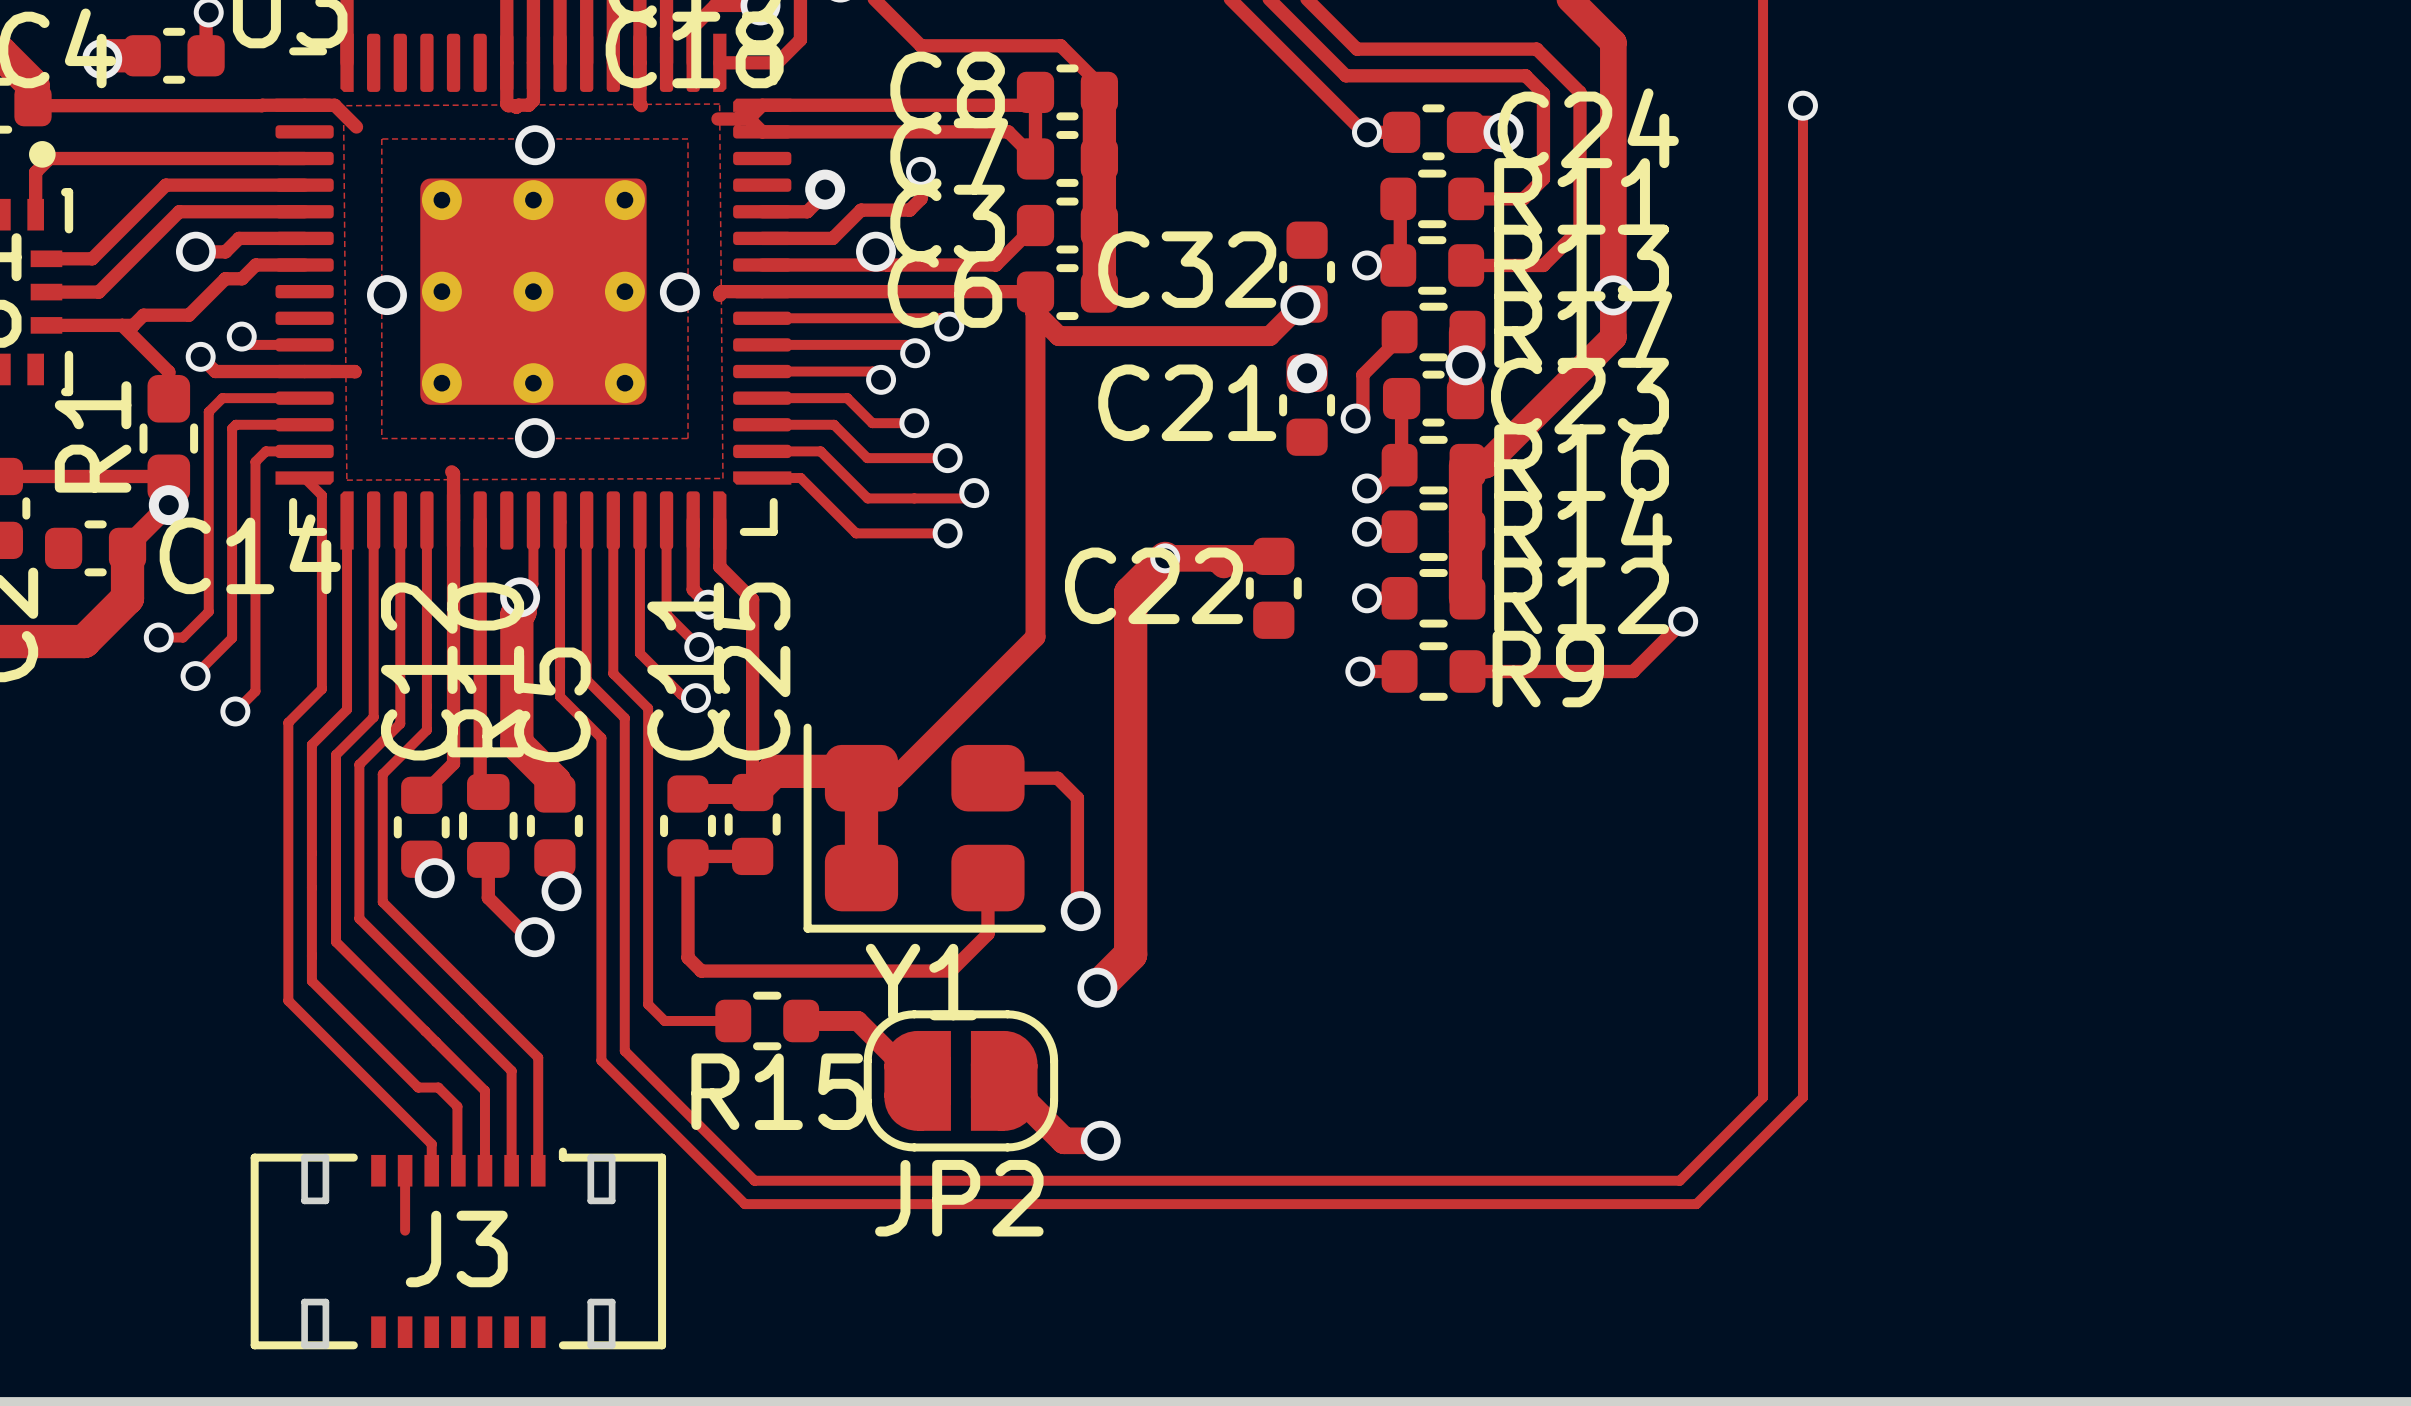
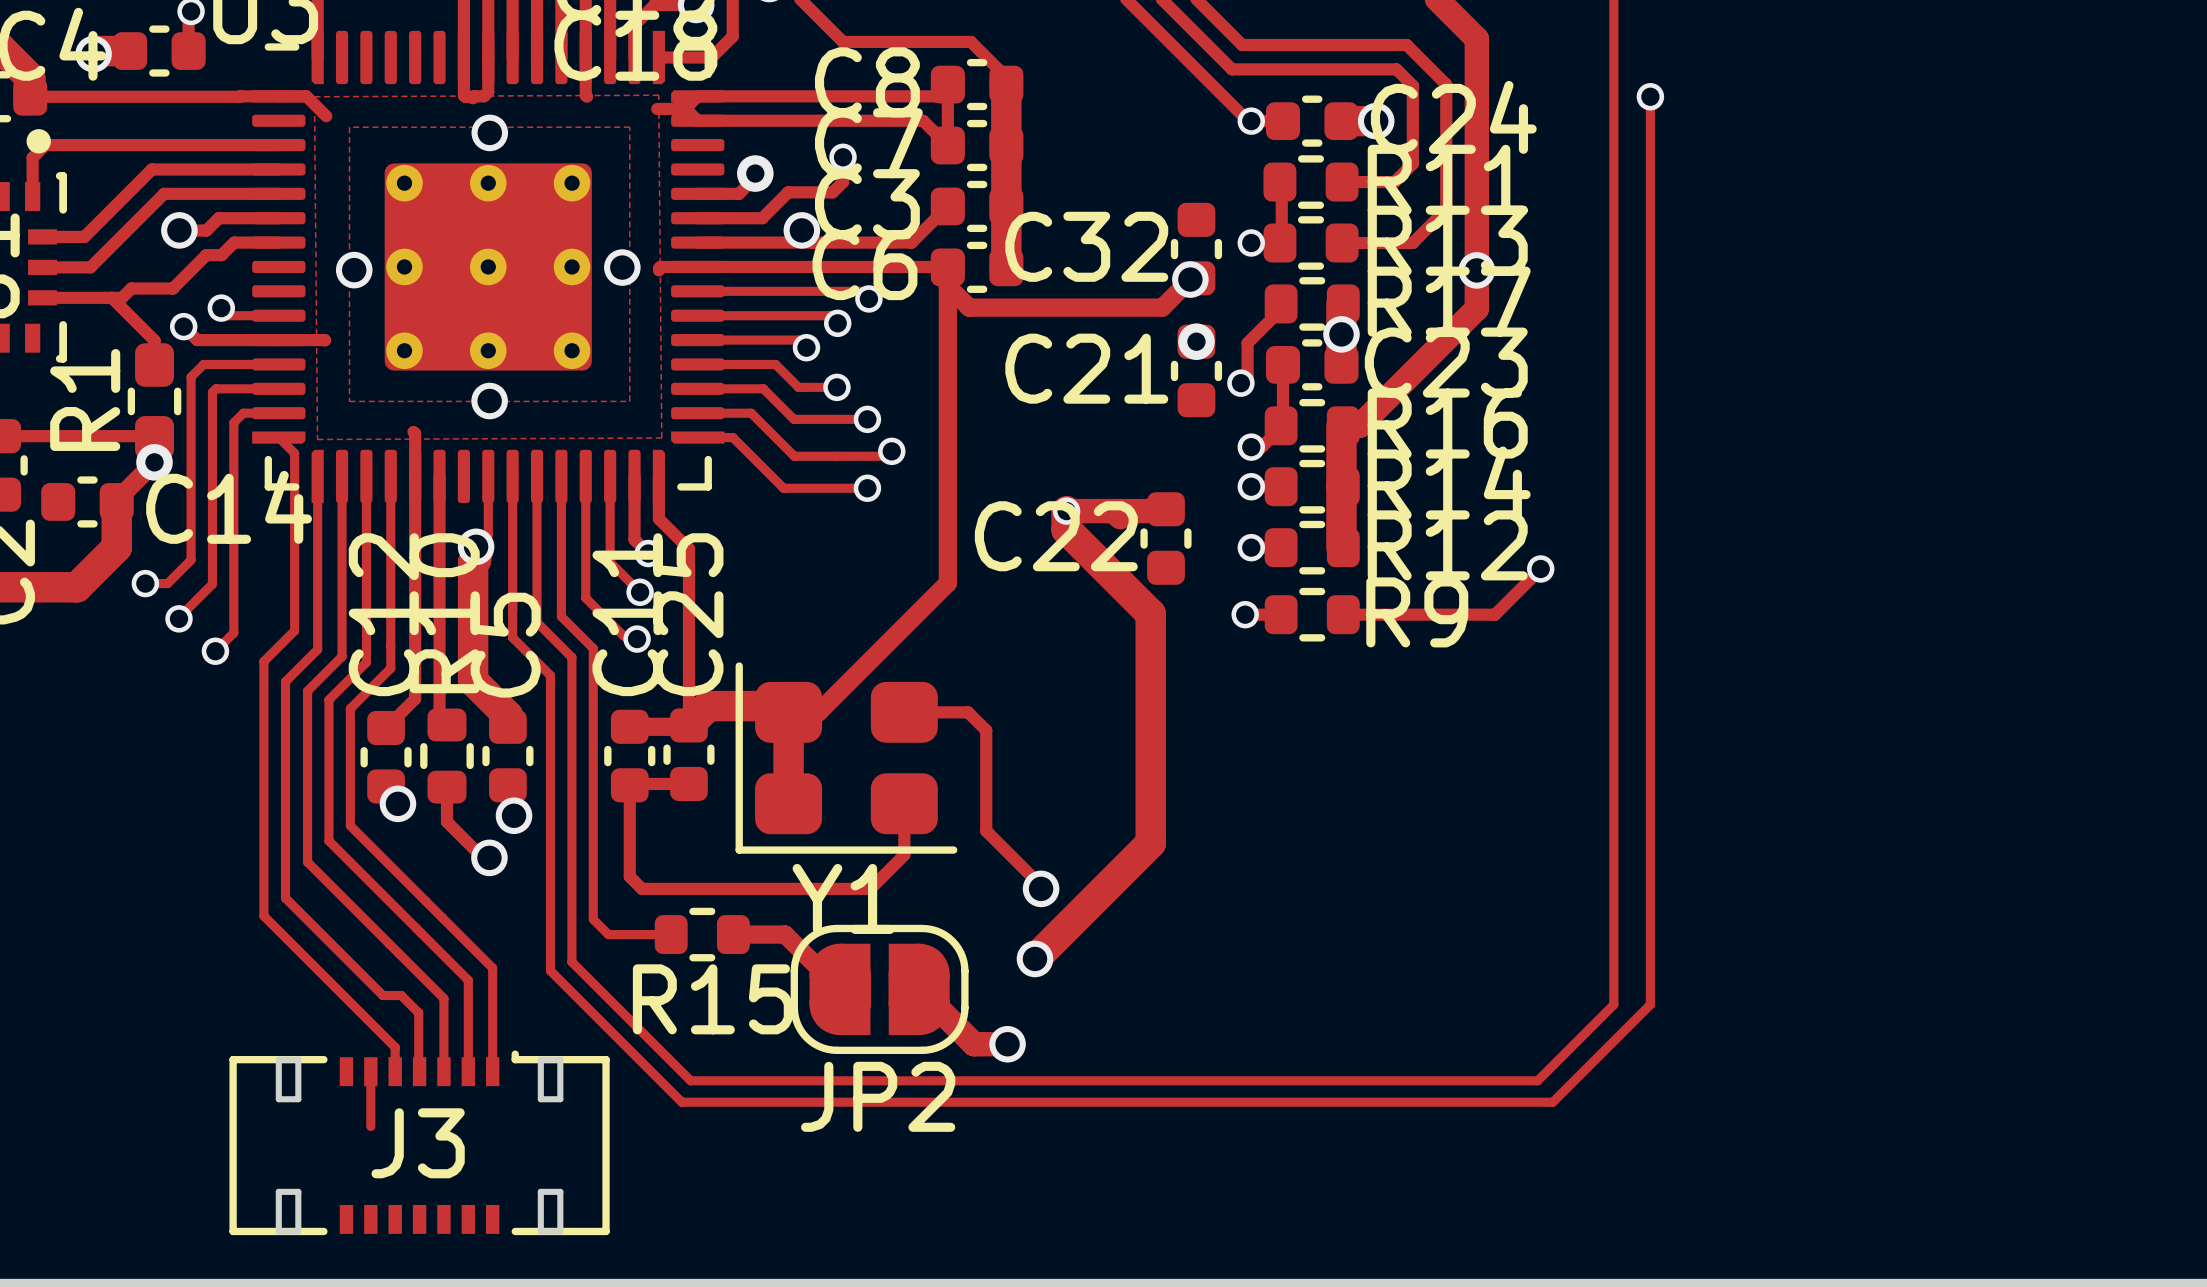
track: (1165, 558) (1130, 592) (1130, 954) (1097, 987) -> (1066, 511) (1066, 529) (1150, 613) (1150, 843) (1034, 958)
track: none -> (989, 834) (1041, 885) (1041, 888)
via: (1080, 911) -> none
via position: (1097, 987) -> (1041, 888)
via: none -> (1034, 958)

